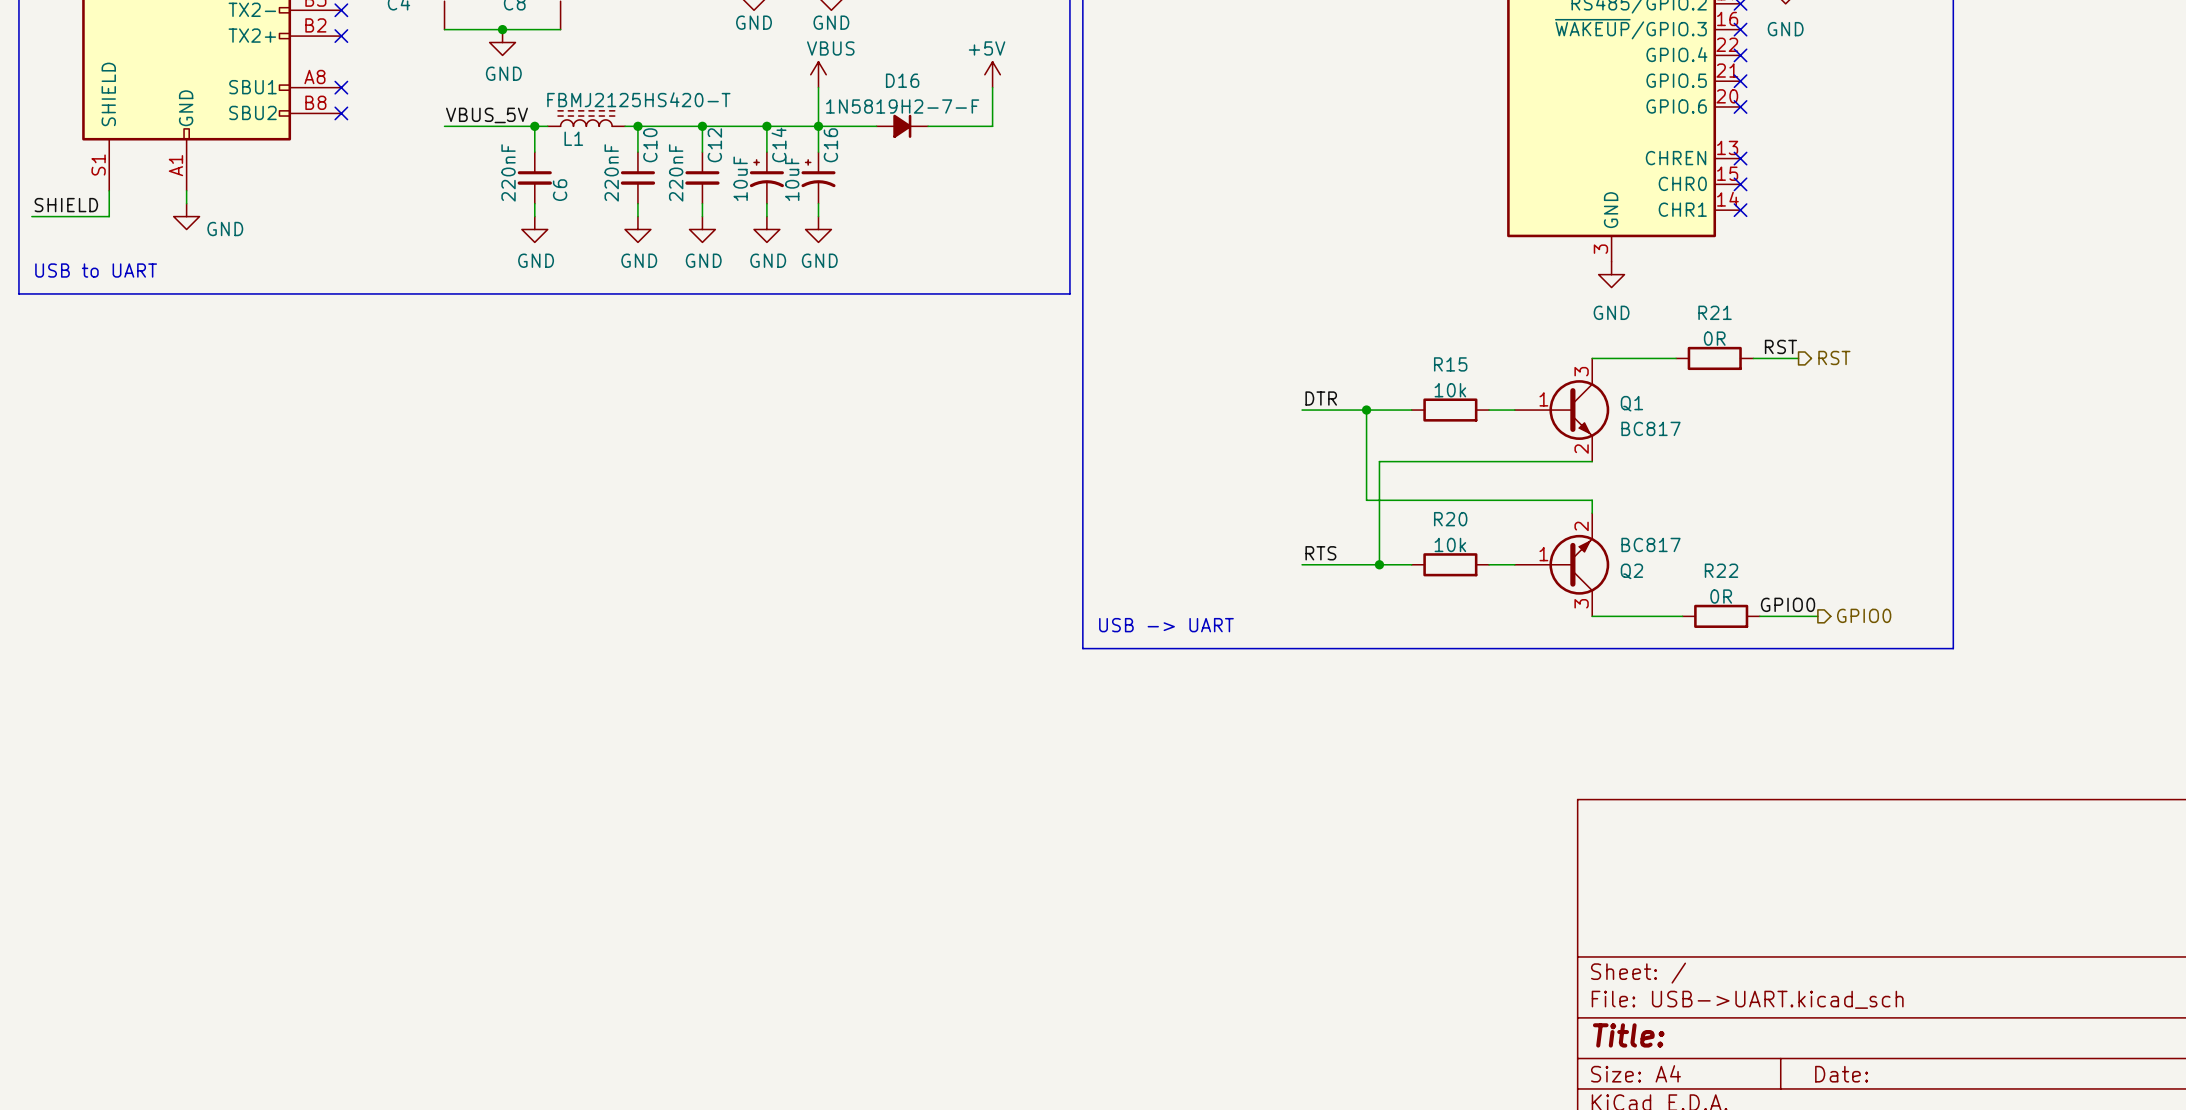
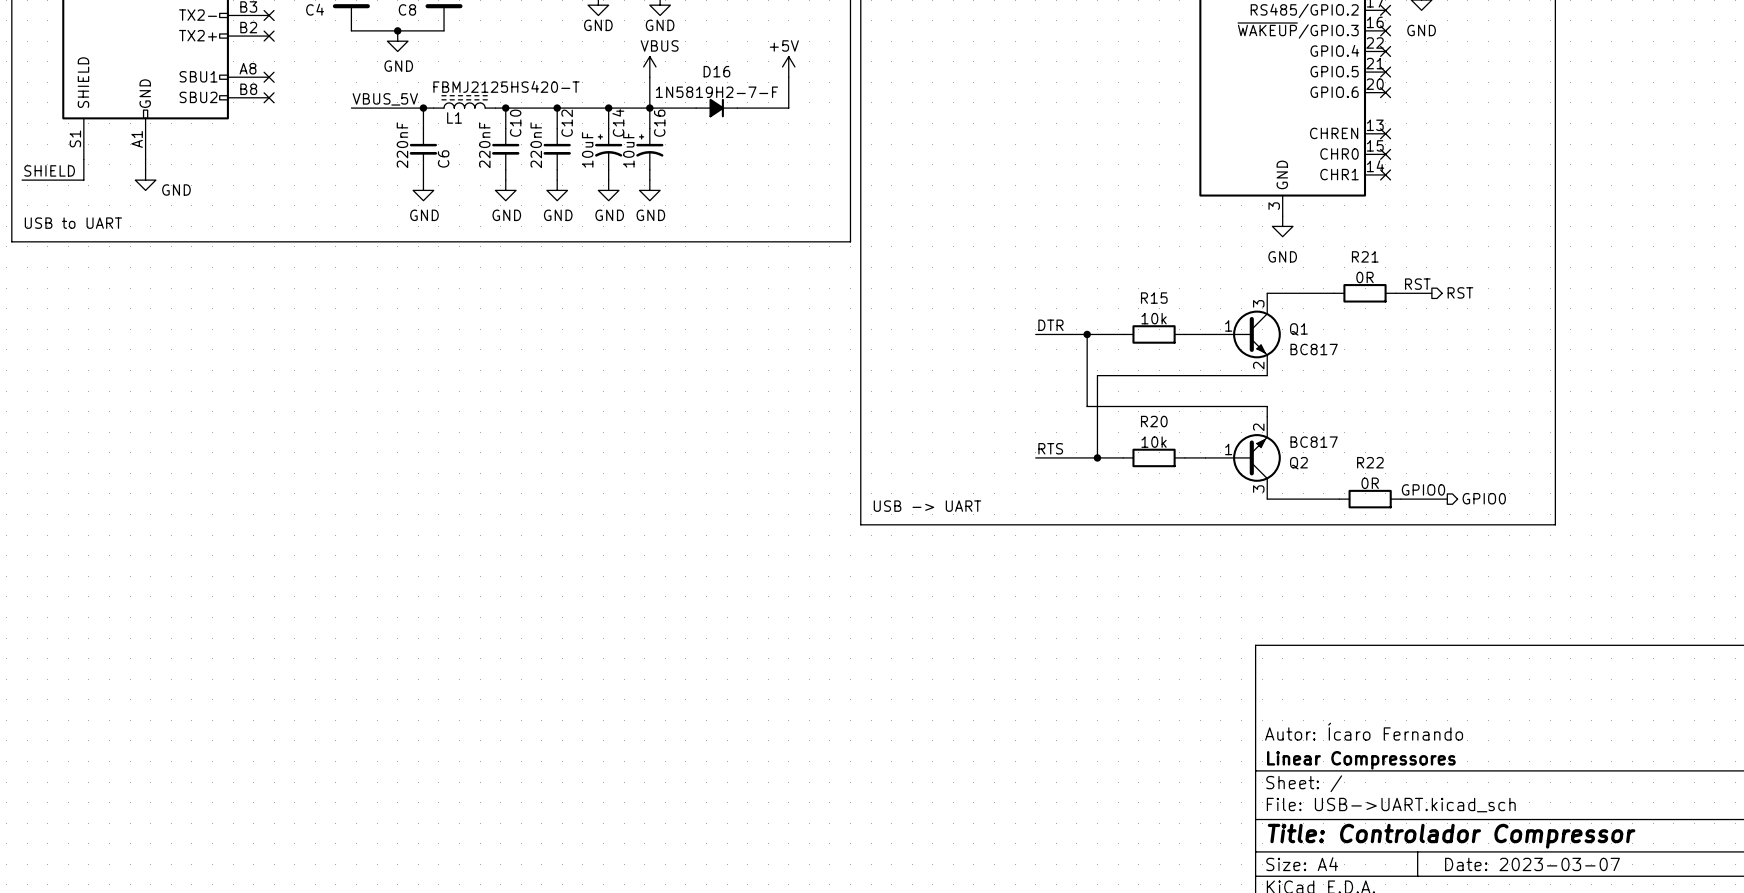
title block: none -> Autor: Ícaro Fernando (1364, 731)
title block: none -> Linear Compressores (1361, 760)
title block: Title: (1628, 1035) -> Title: Controlador Compressor (1451, 836)
title block: Date: (1841, 1074) -> Date: 2023-03-07 (1532, 864)

